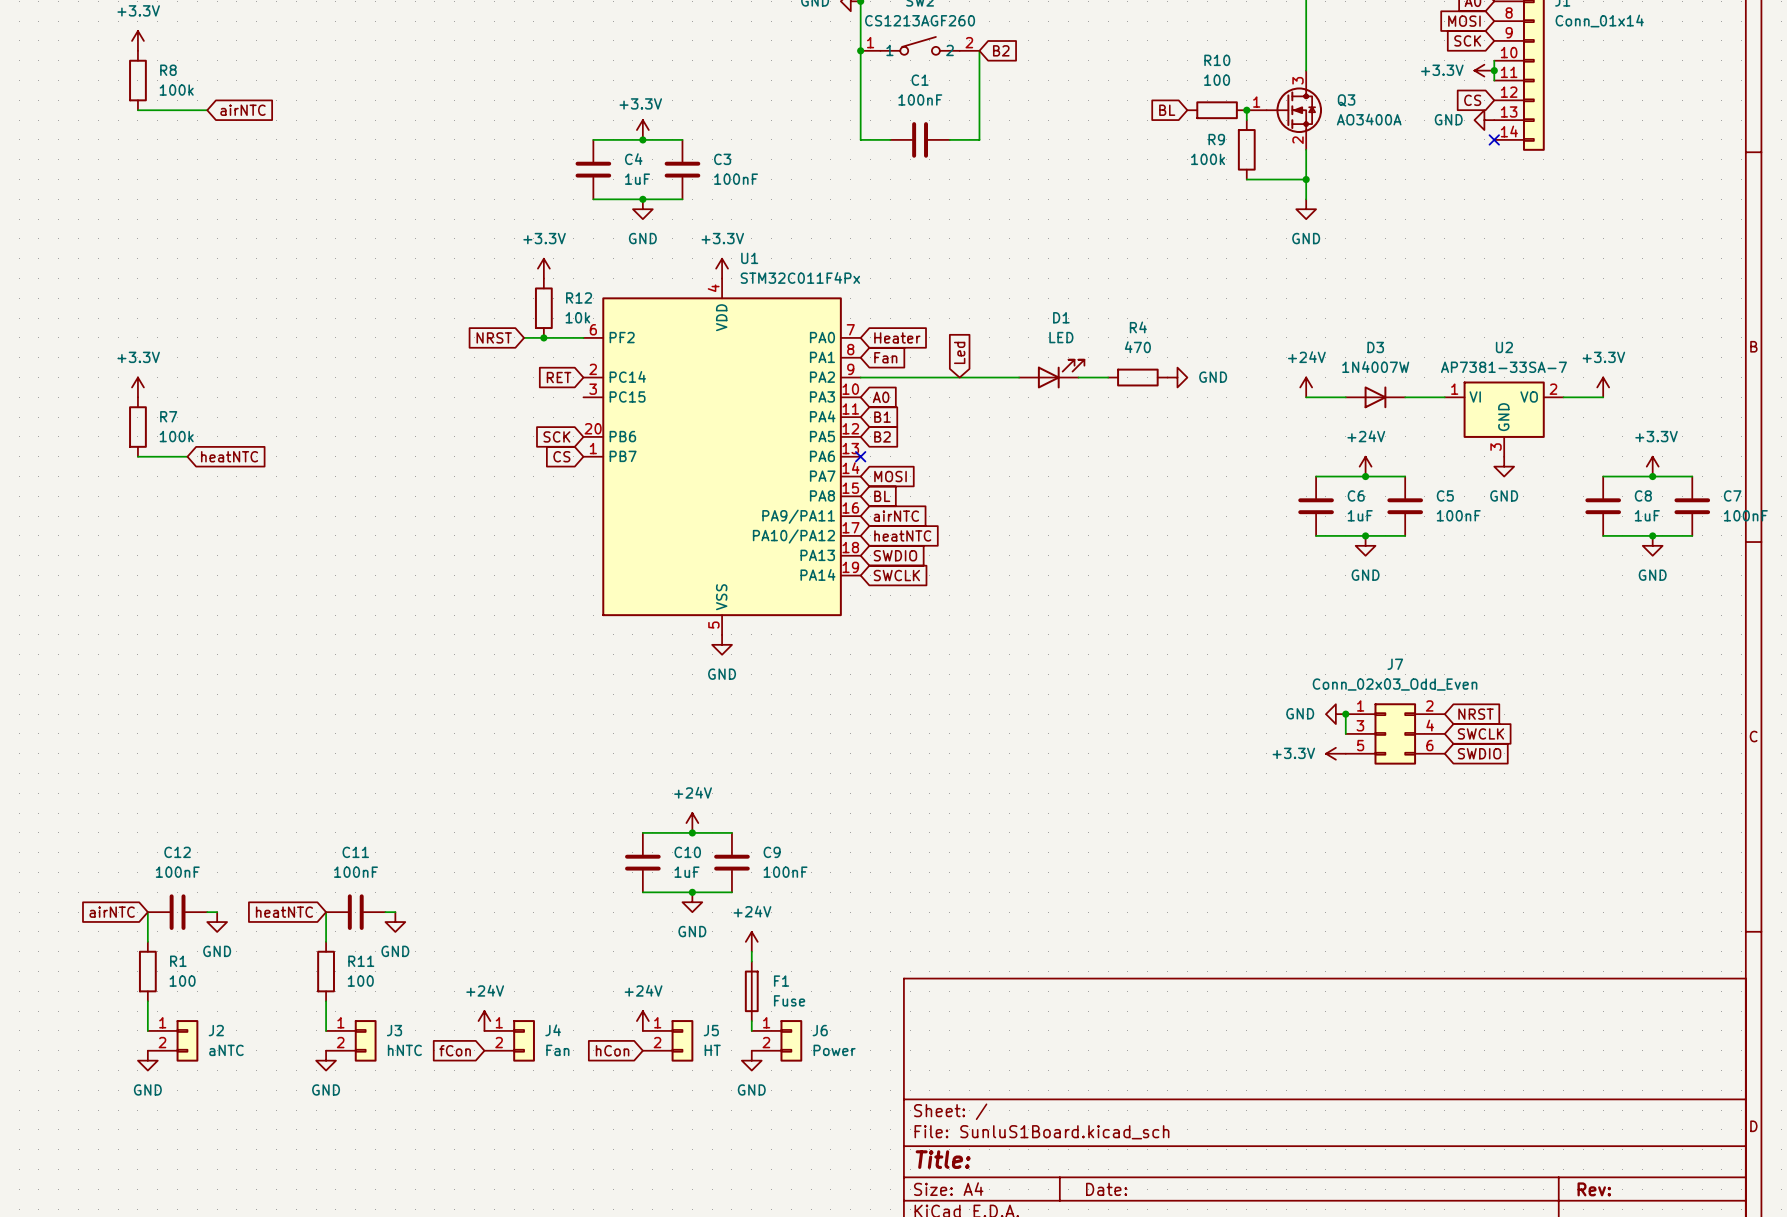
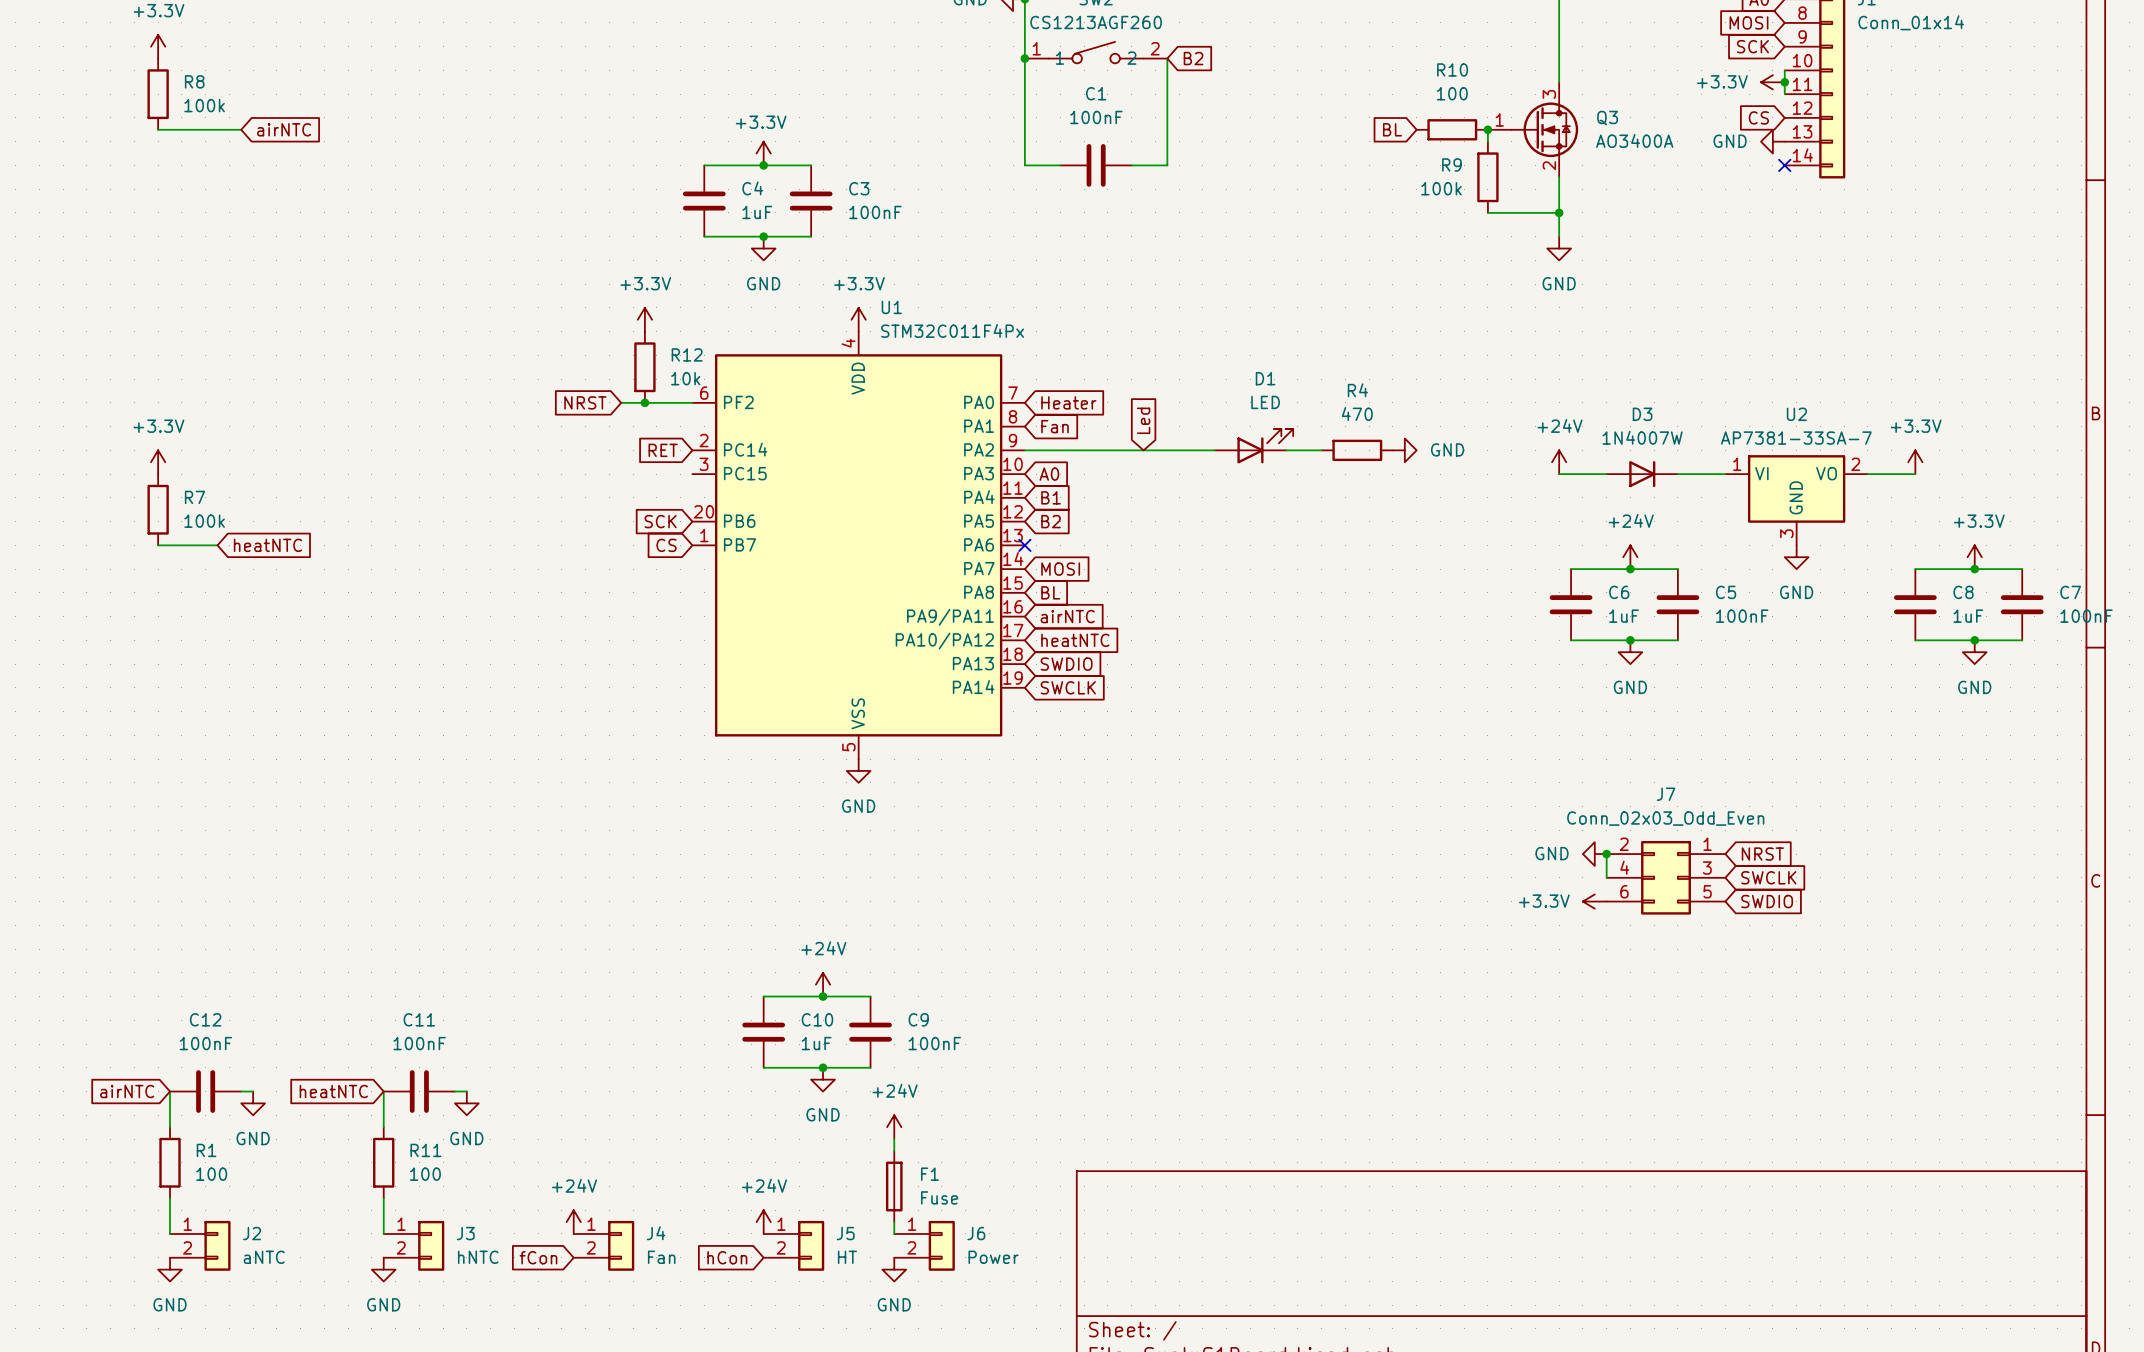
J7 flip: as is (1395, 733) -> left-right (1666, 877)

